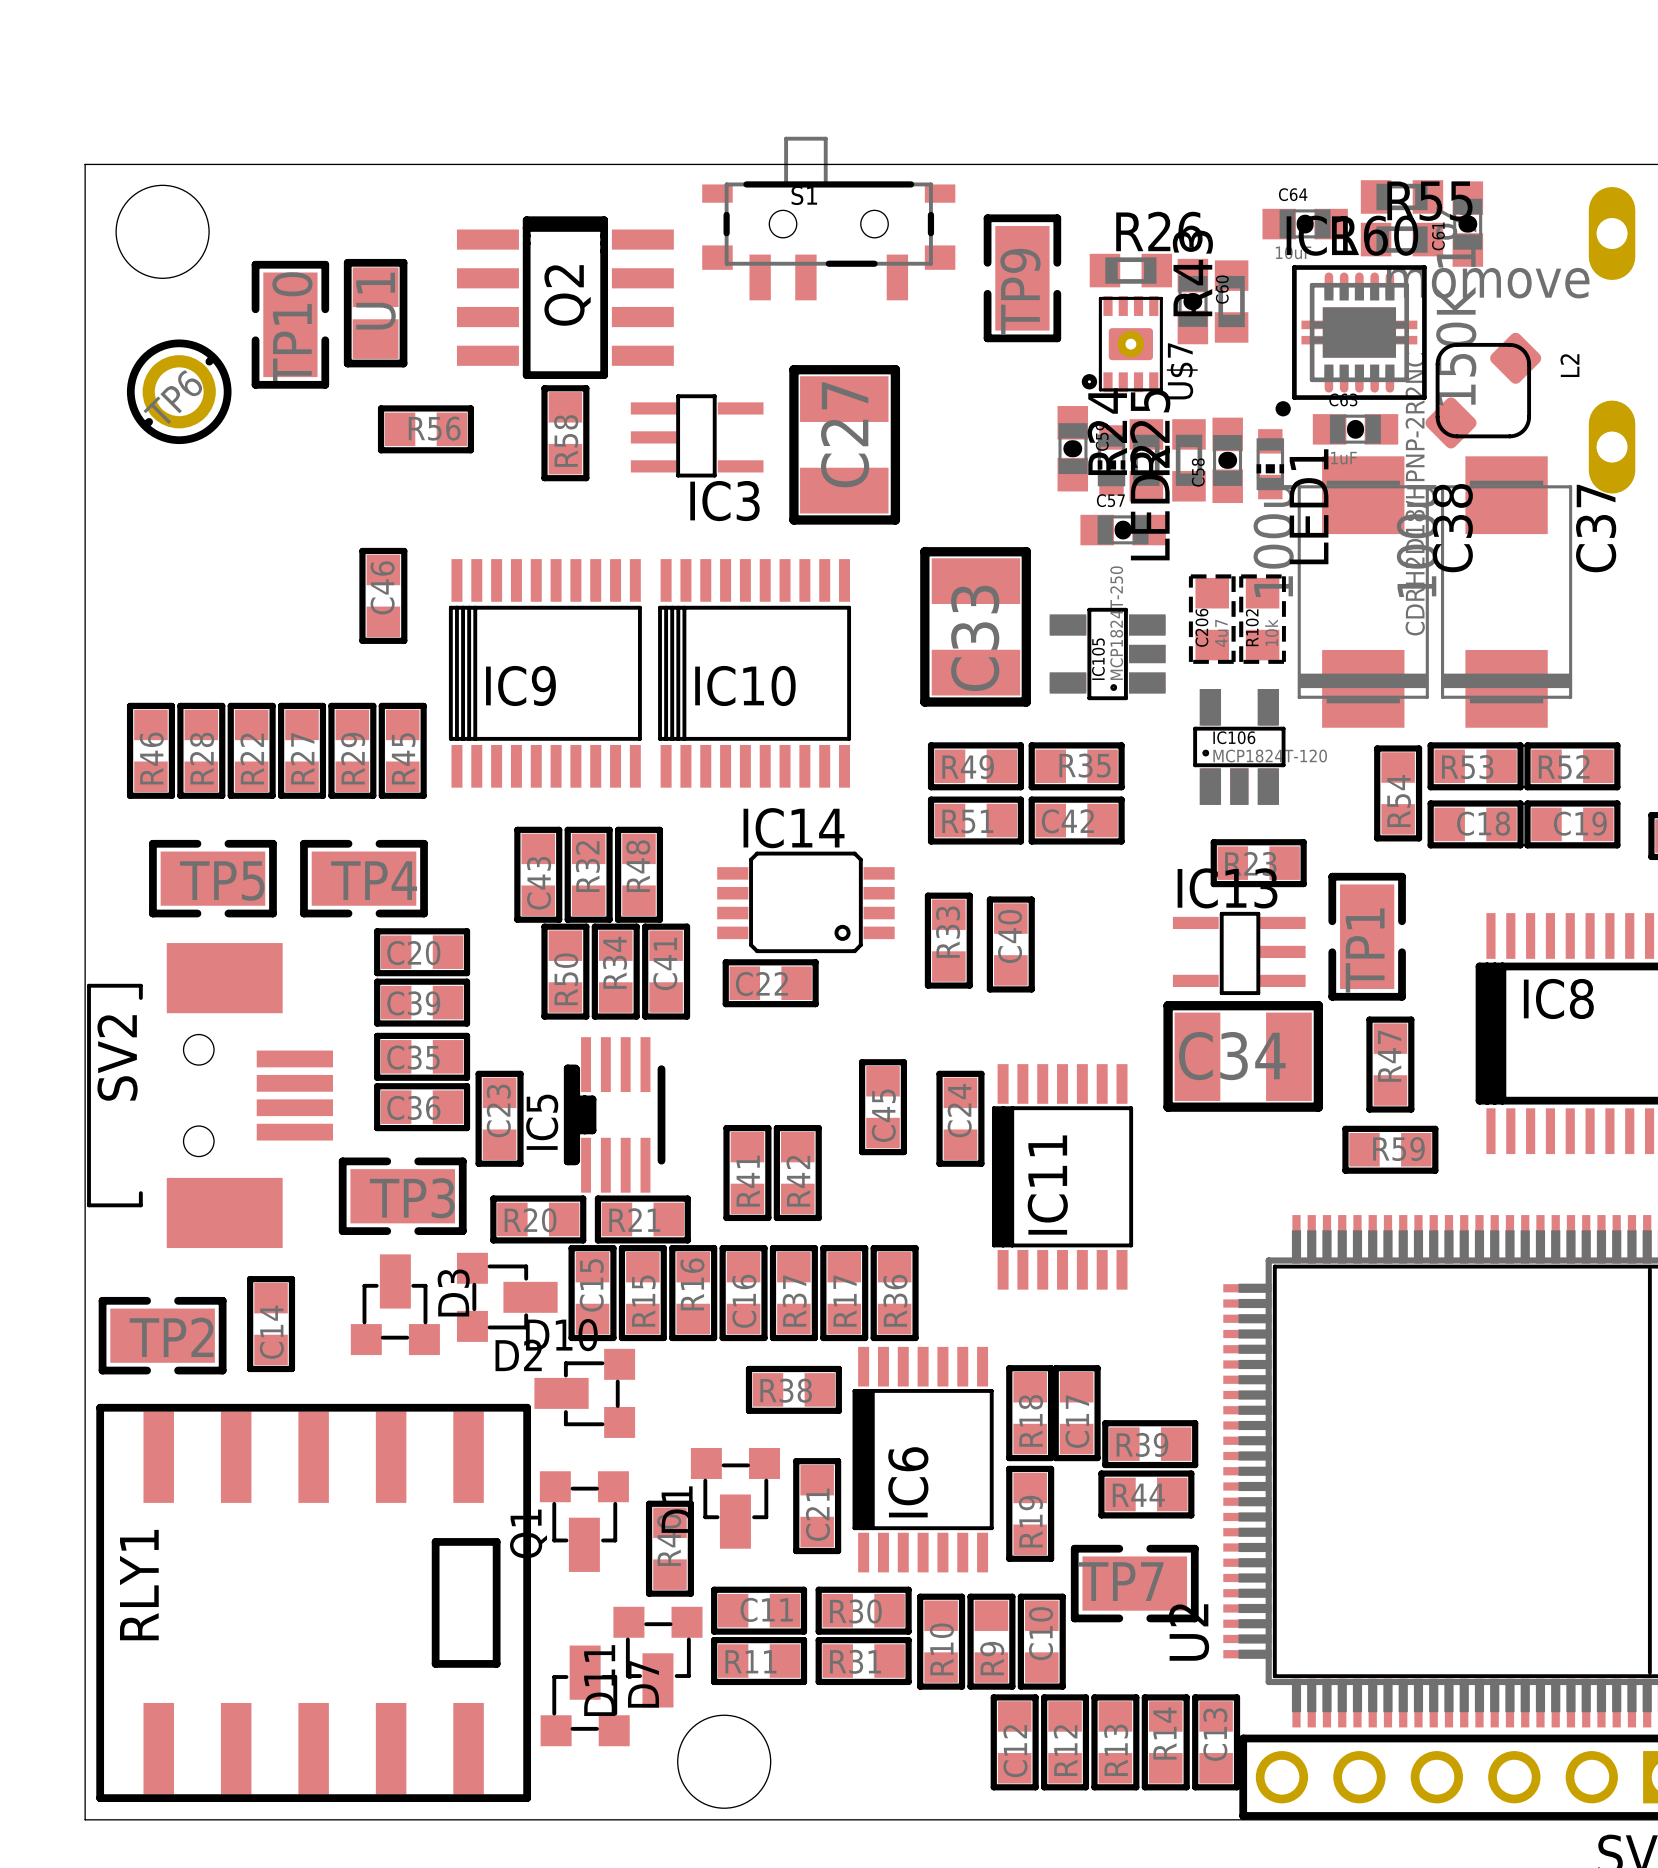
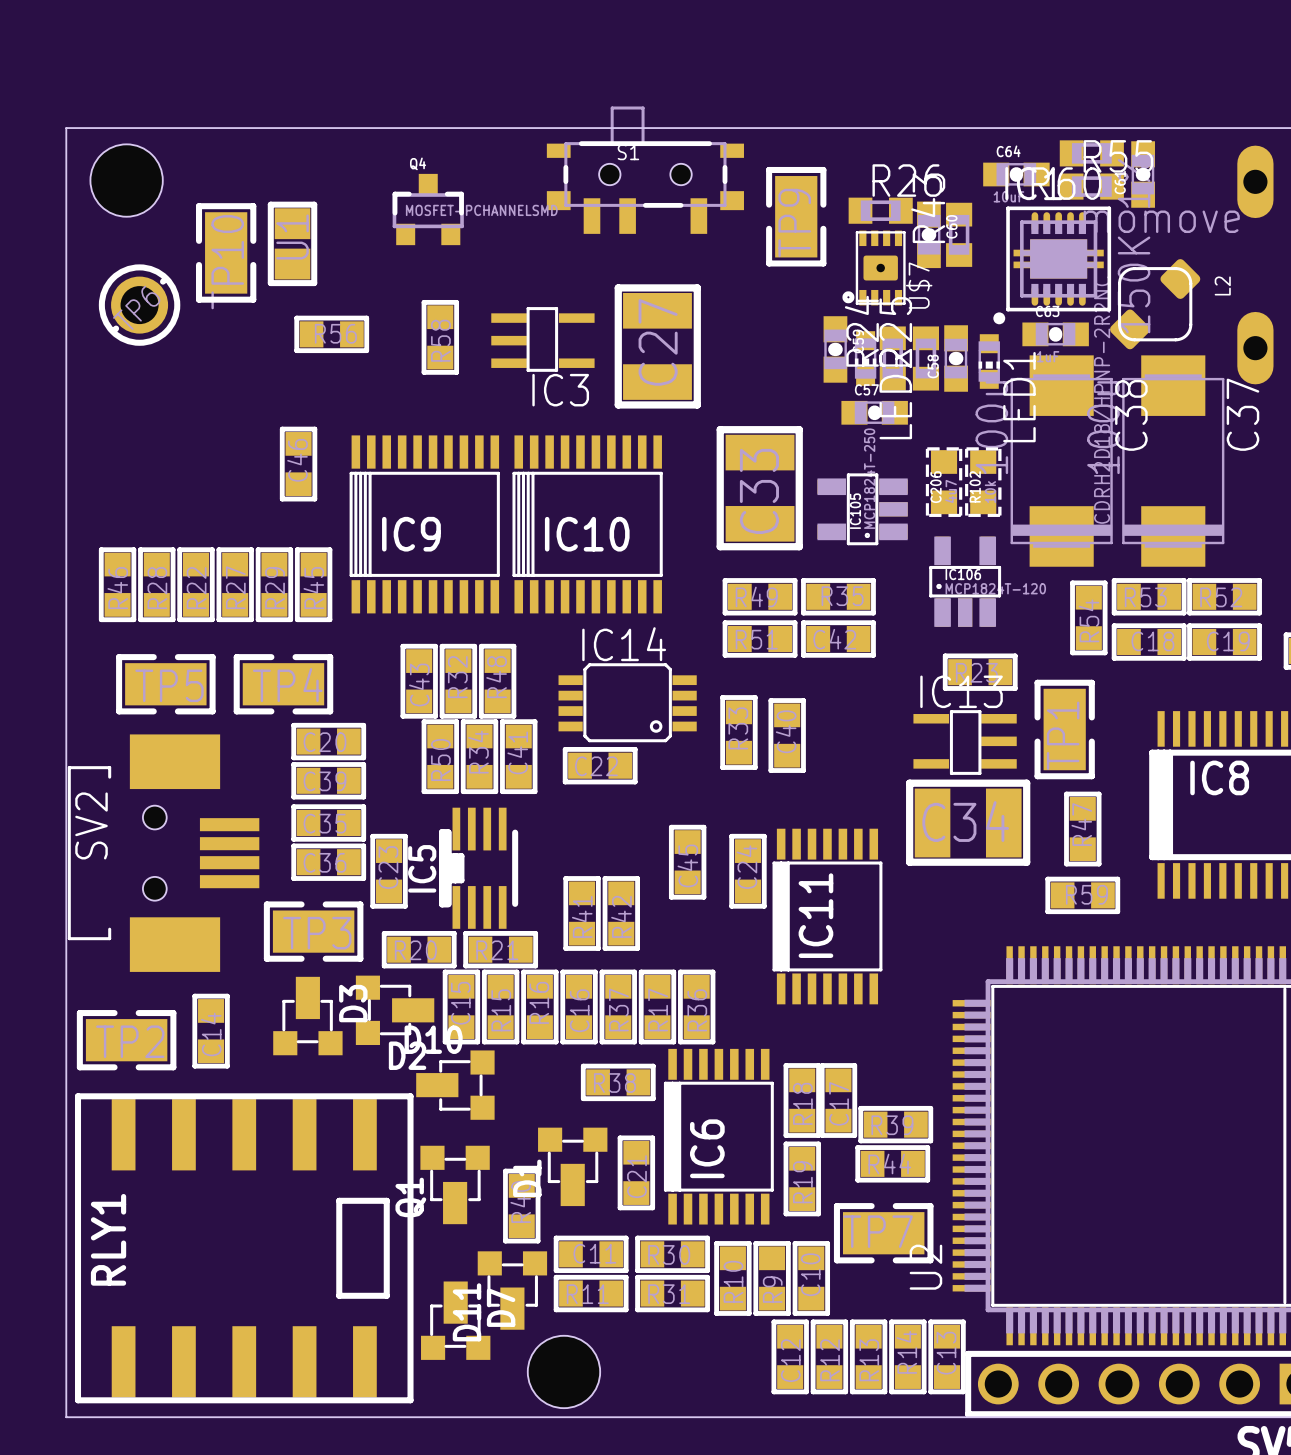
Q4: none -> MOSFET-PCHANNELSMD (428, 209)
Q2: (565, 297) -> none

